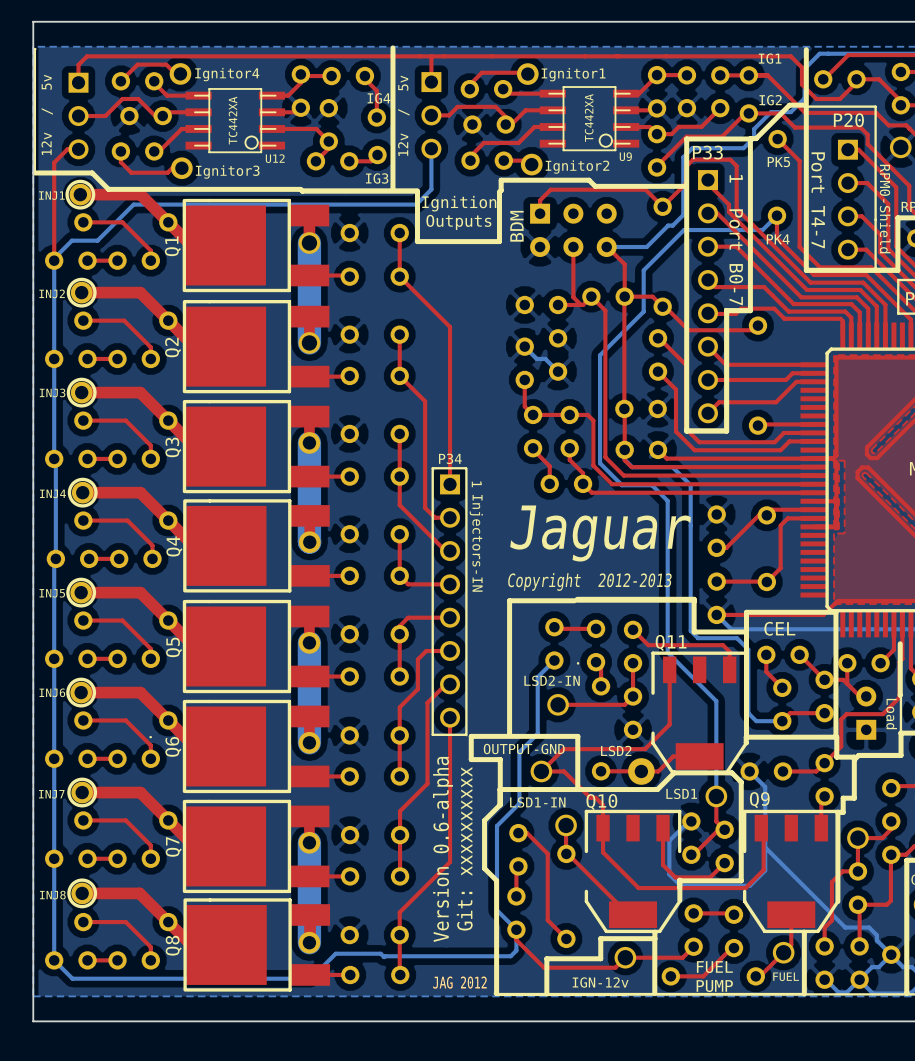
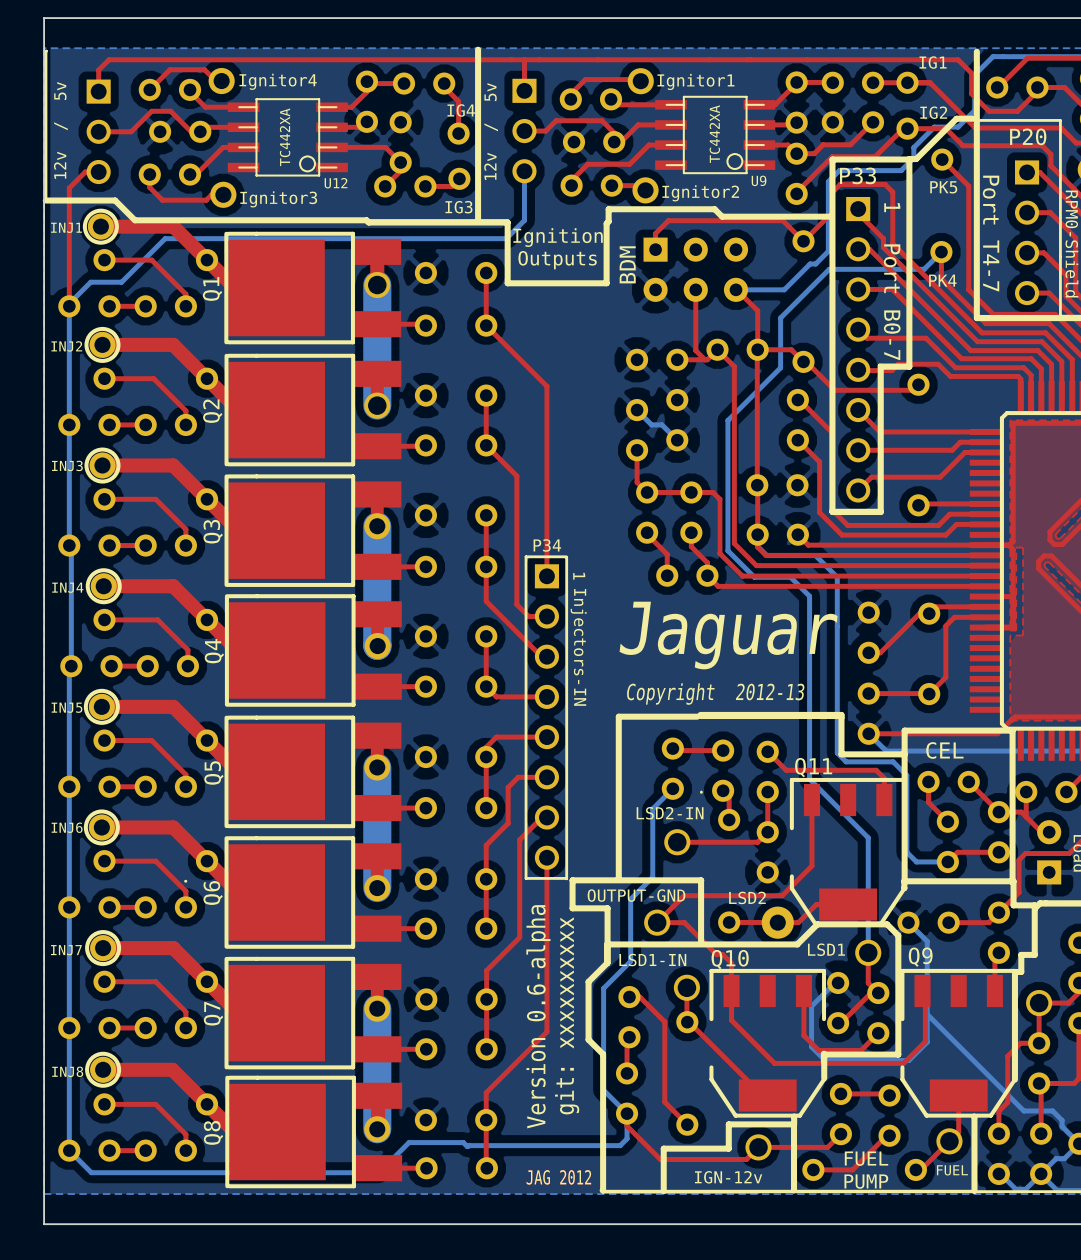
text: Copyright 2012-2013 (589, 581) -> Copyright 2012-13 (715, 694)
text: Git: xxxxxxxxxx (464, 848) -> git: xxxxxxxxxx (567, 1015)

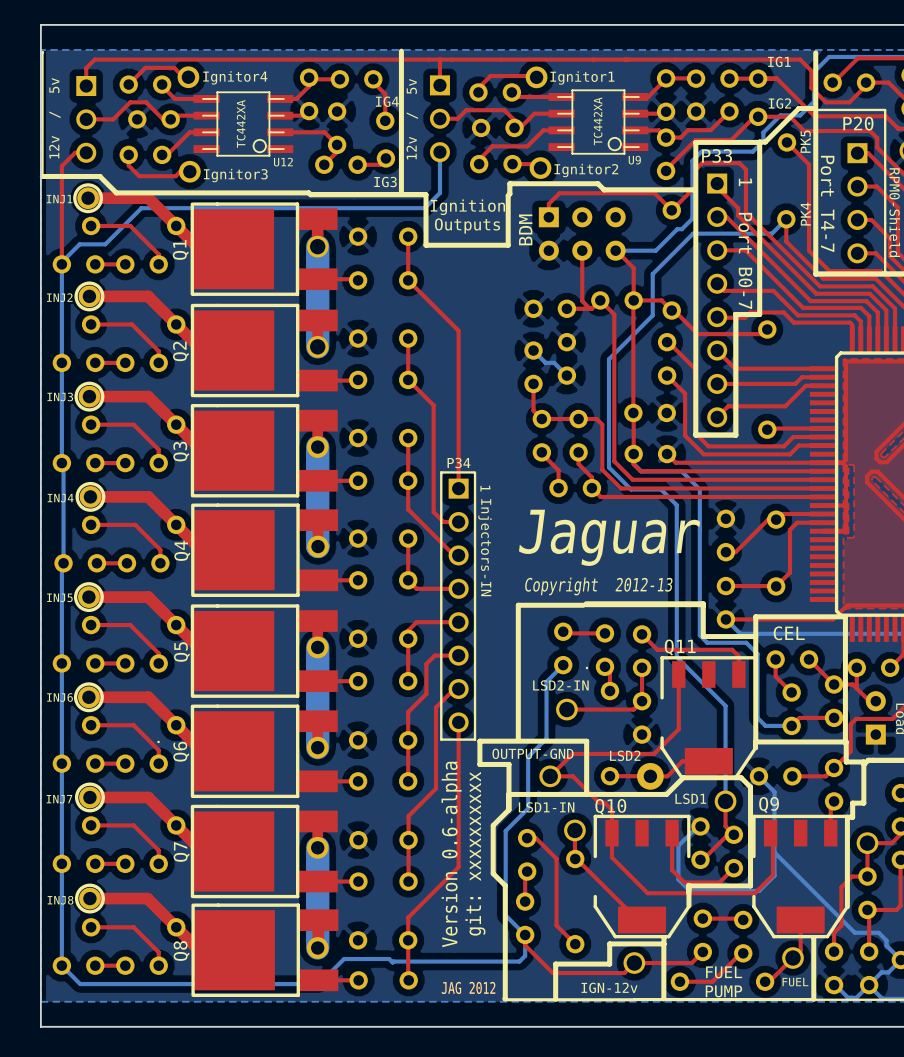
text rotation: 0° (943, 187) -> 90° counterclockwise (805, 141)
text rotation: 0° (942, 280) -> 90° counterclockwise (805, 214)
text position: PK4 (942, 280) -> PK4 (805, 214)

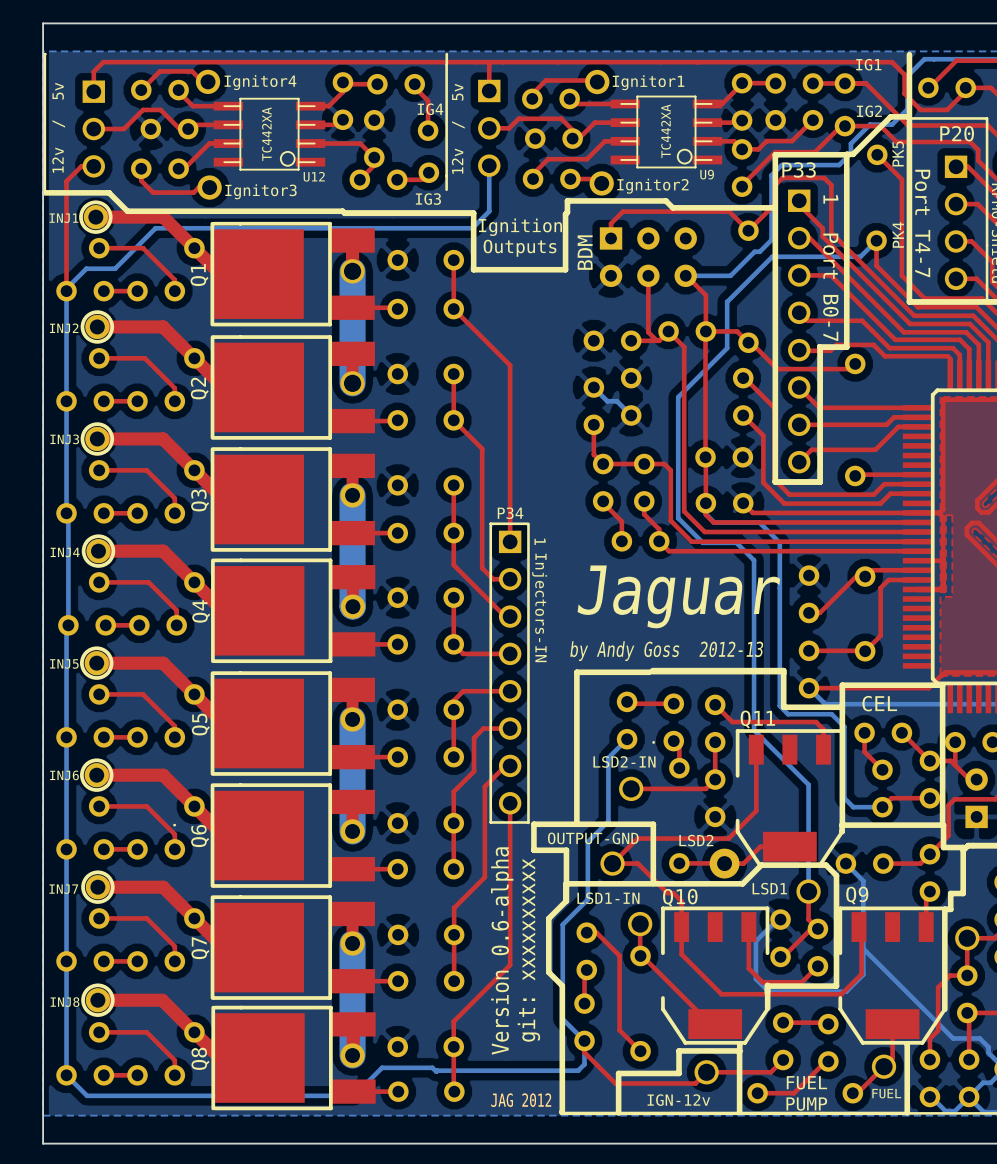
line: (401, 51) (401, 193) -> none
text: Copyright 2012-13 (598, 586) -> by Andy Goss 2012-13 (666, 651)

